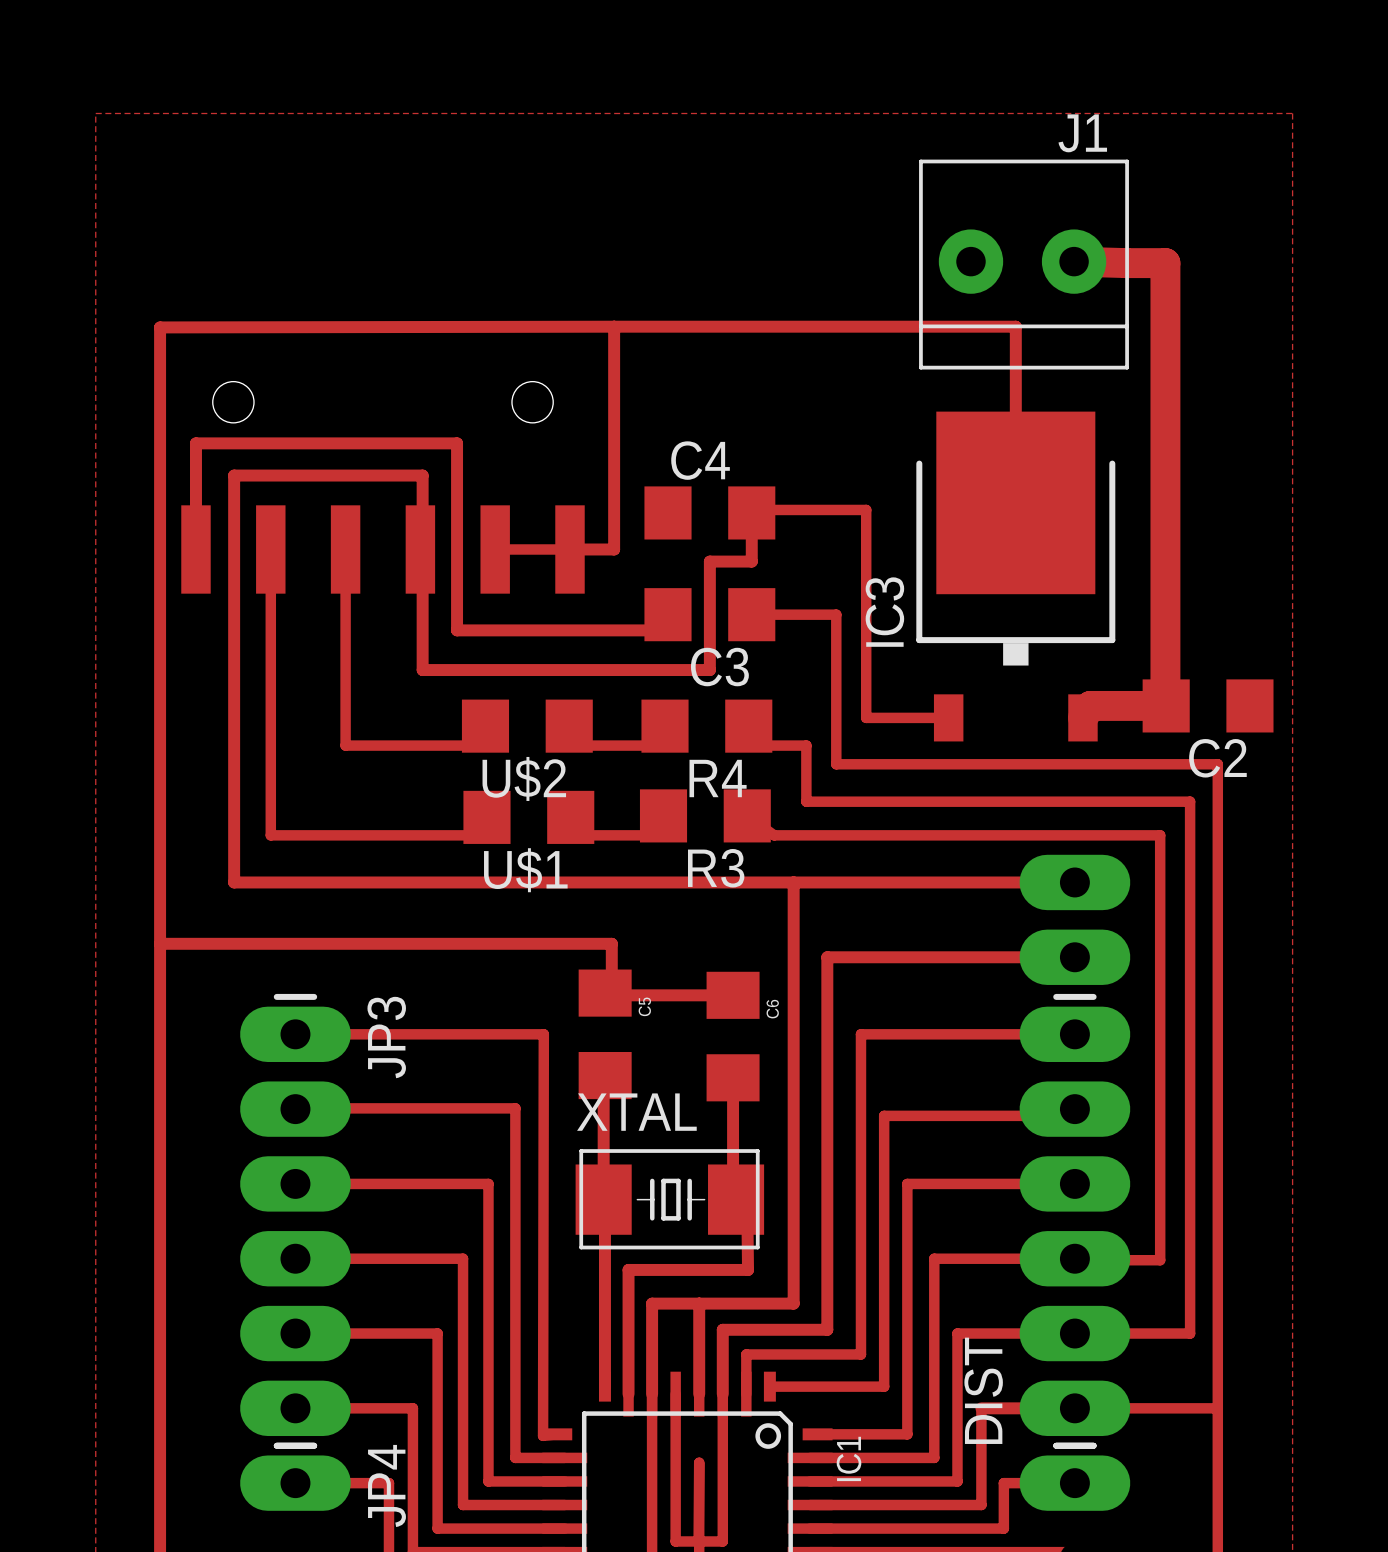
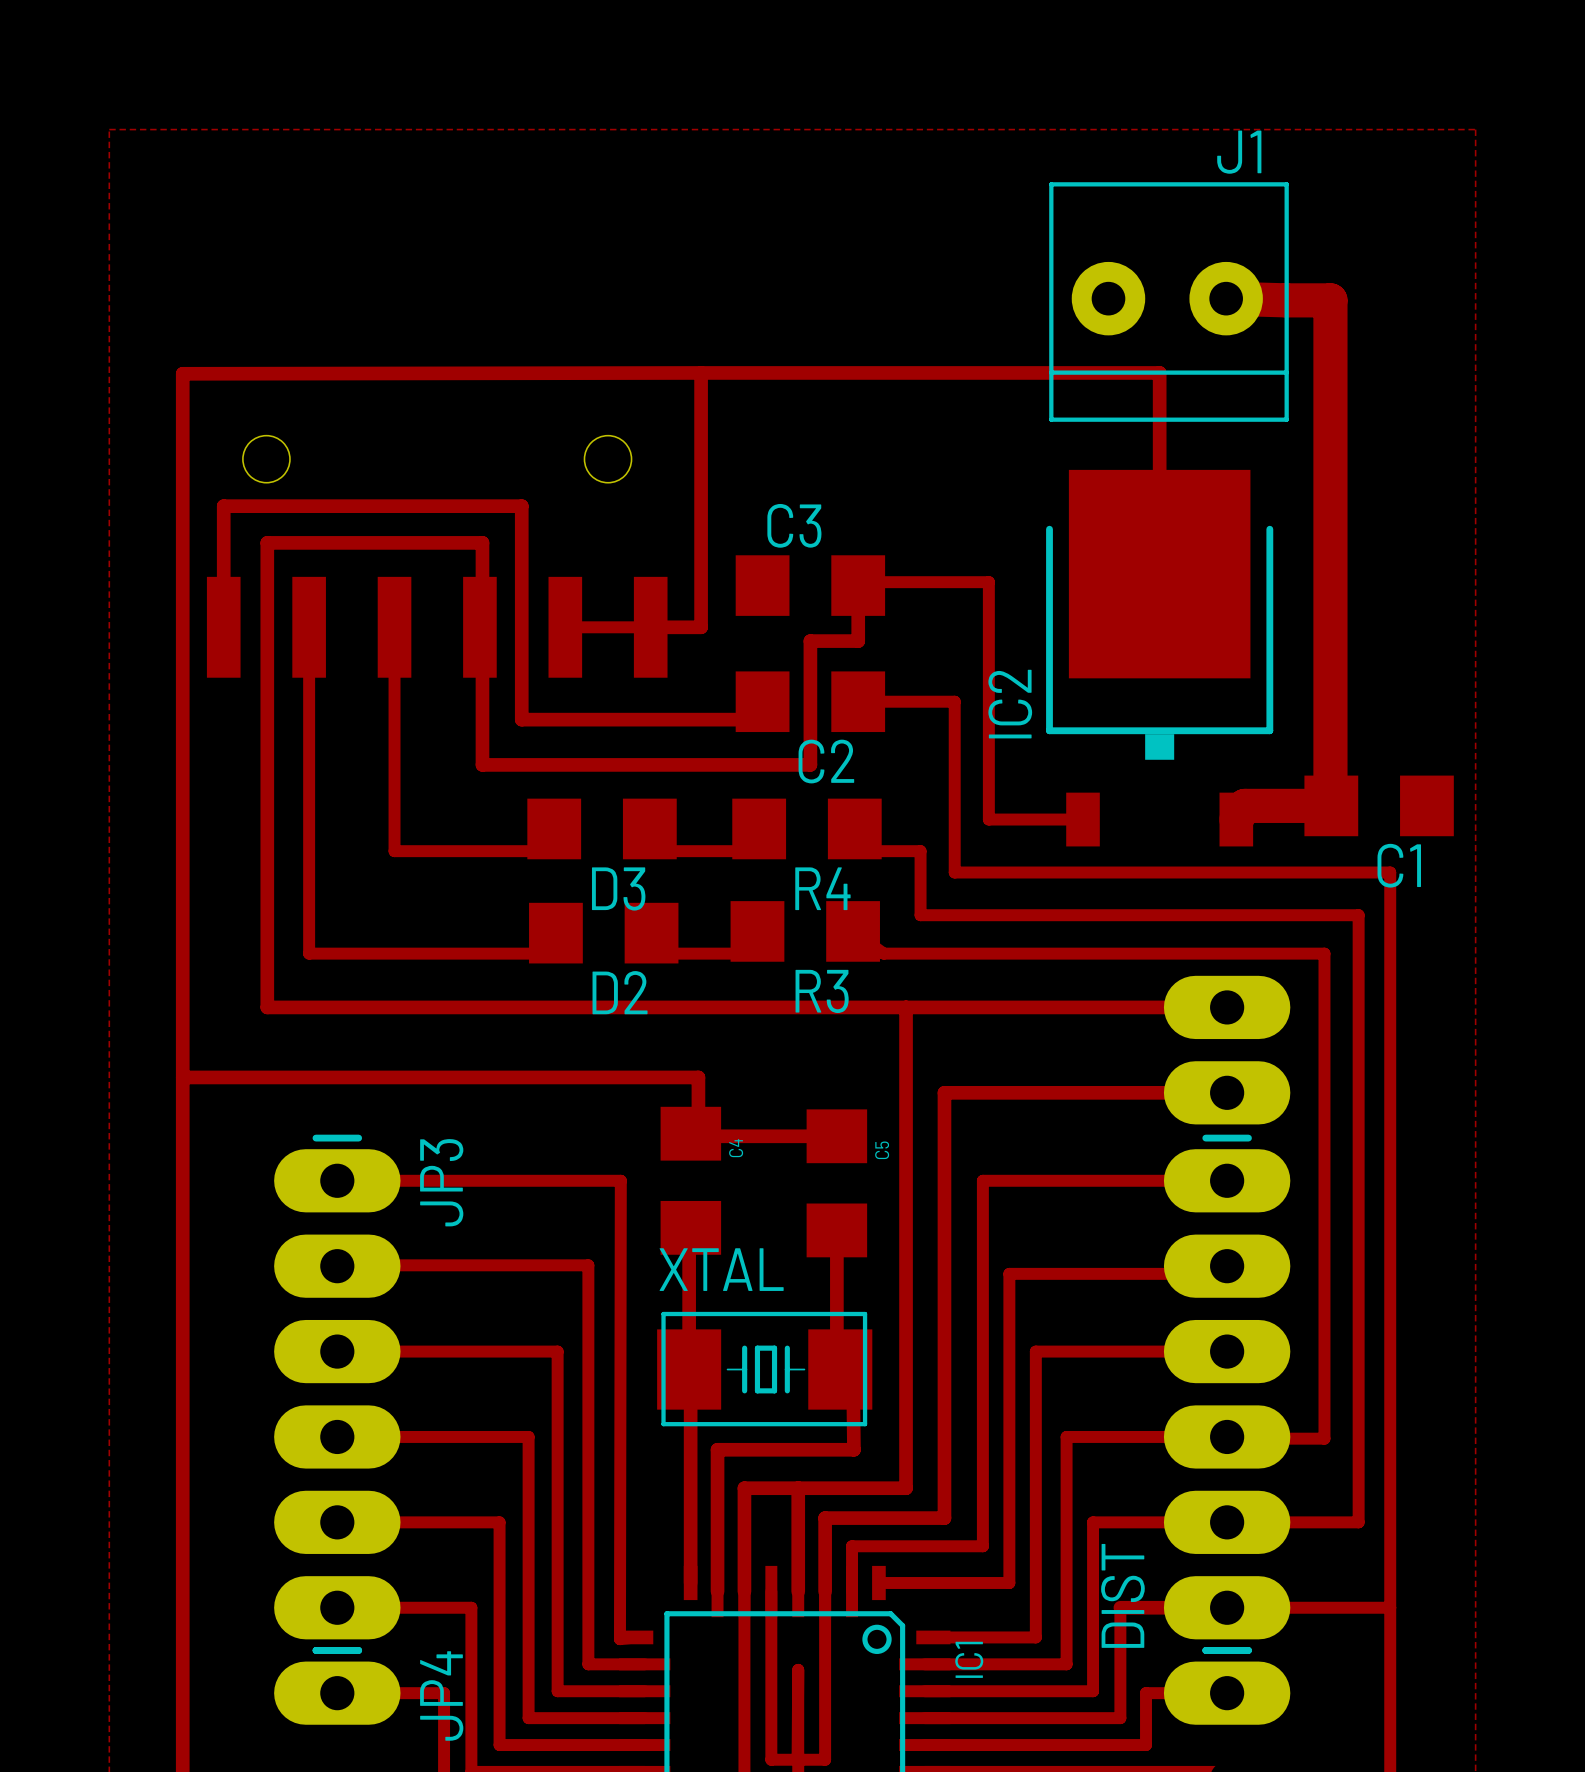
C4 name: C4 (700, 460) -> C3 (794, 525)
IC3 name: IC3 (884, 612) -> IC2 (1010, 704)
C3 name: C3 (719, 667) -> C2 (826, 761)
C2 name: C2 (1217, 758) -> C1 (1399, 865)
U$2 name: U$2 (524, 778) -> D3 (618, 888)
U$1 name: U$1 (525, 870) -> D2 (620, 992)
C5 name: C5 (644, 1006) -> C4 (736, 1148)
C6 name: C6 (772, 1009) -> C5 (882, 1150)

